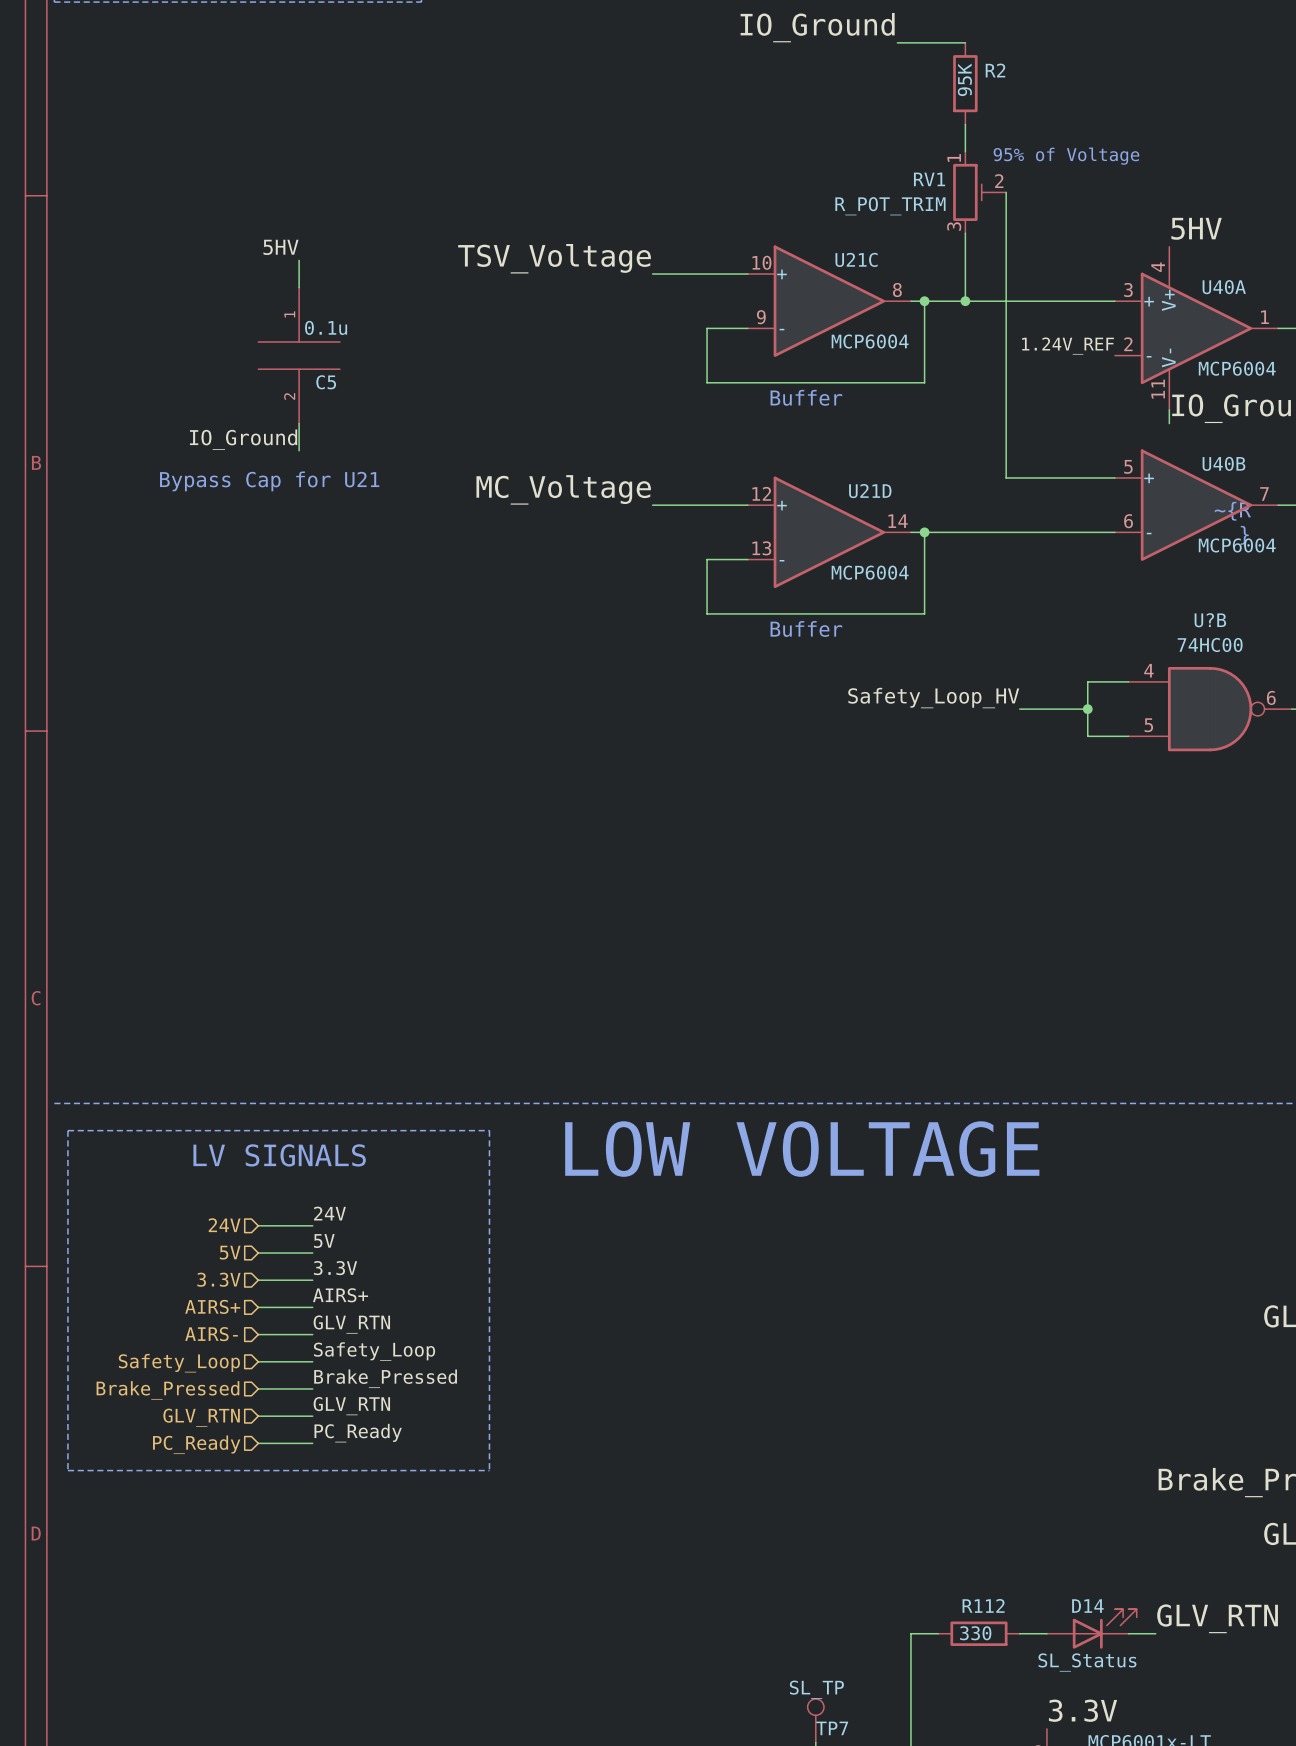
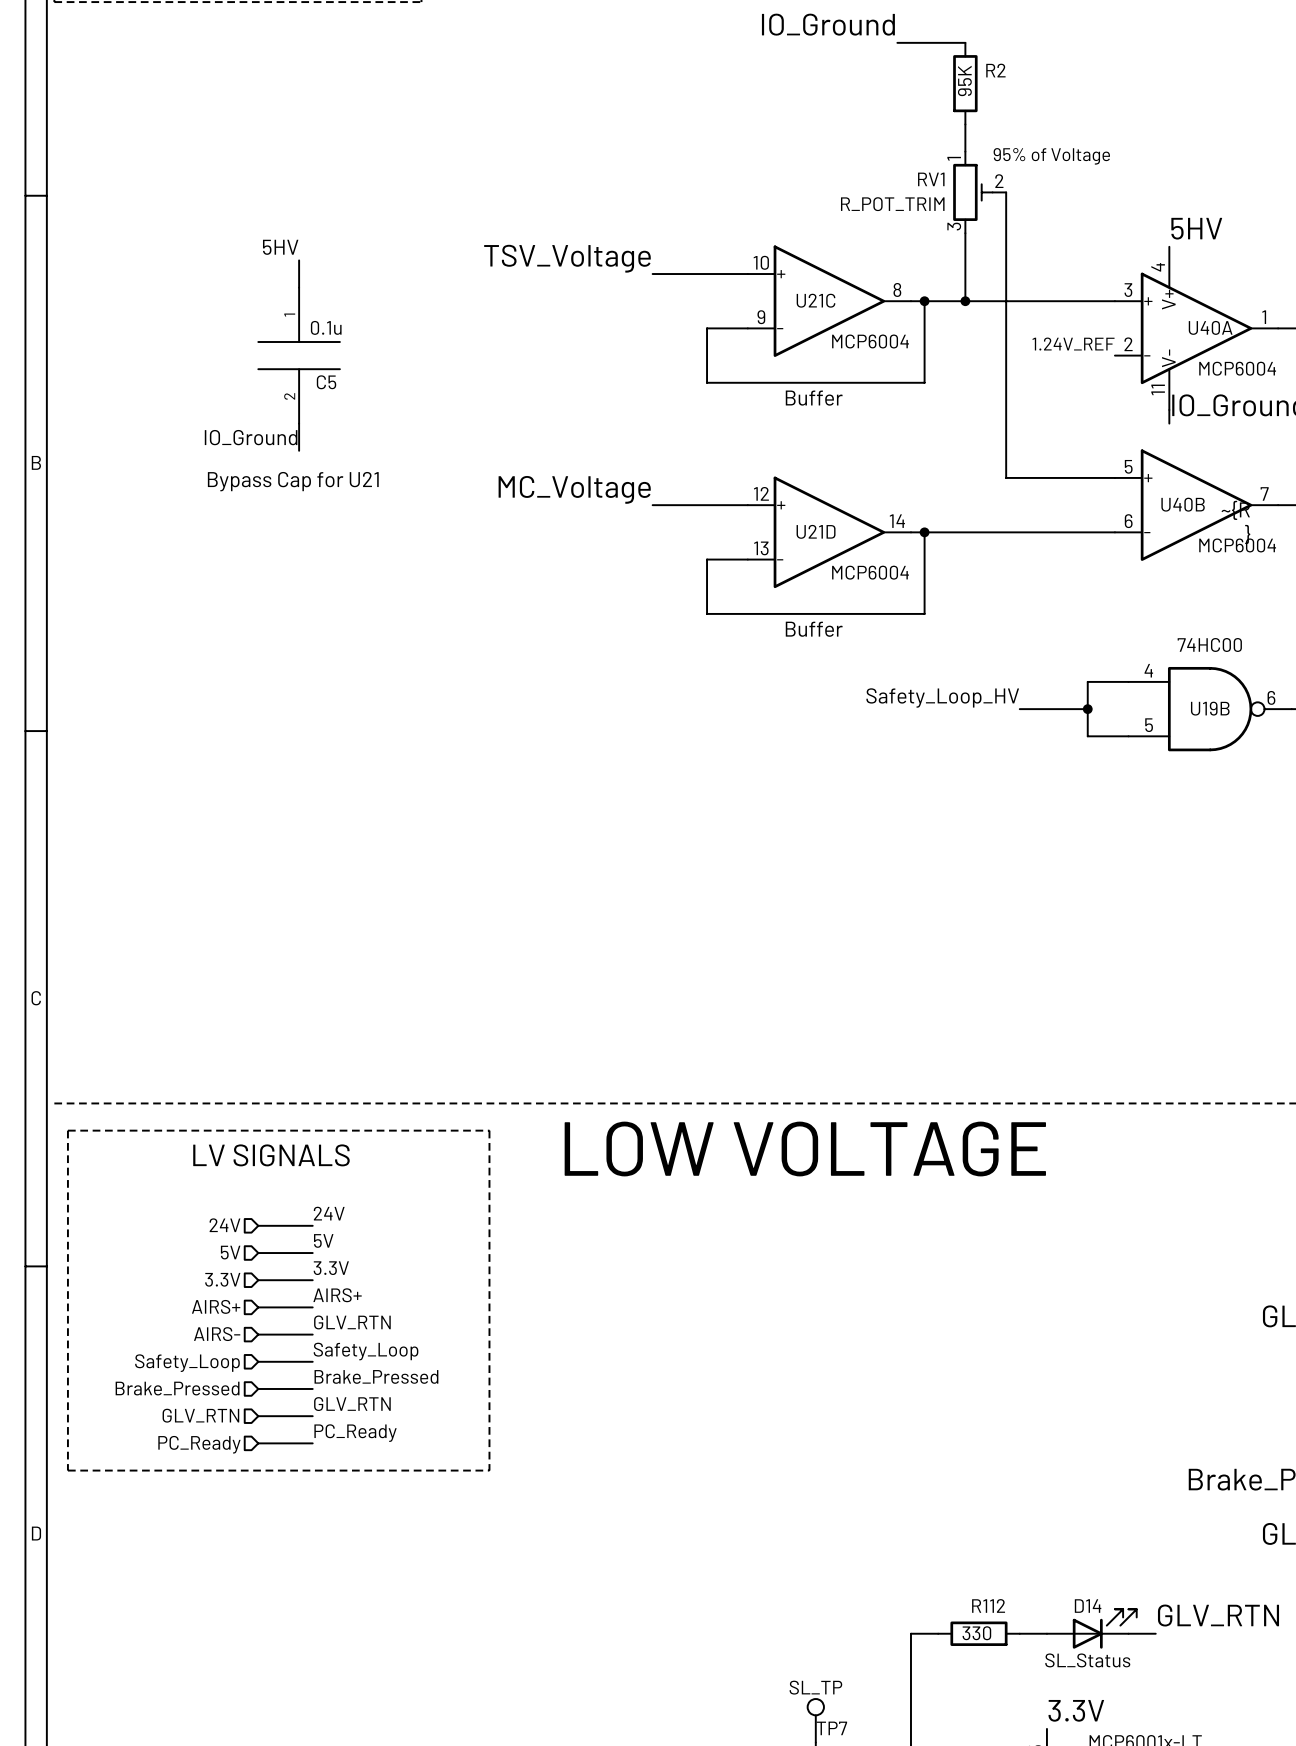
U21C name position: U21C (856, 259) -> U21C (816, 300)
U40A name position: U40A (1224, 287) -> U40A (1210, 327)
U40B name position: U40B (1223, 463) -> U40B (1183, 504)
U21D name position: U21D (870, 491) -> U21D (816, 531)
U?B name: U?B (1210, 620) -> U19B (1210, 708)

